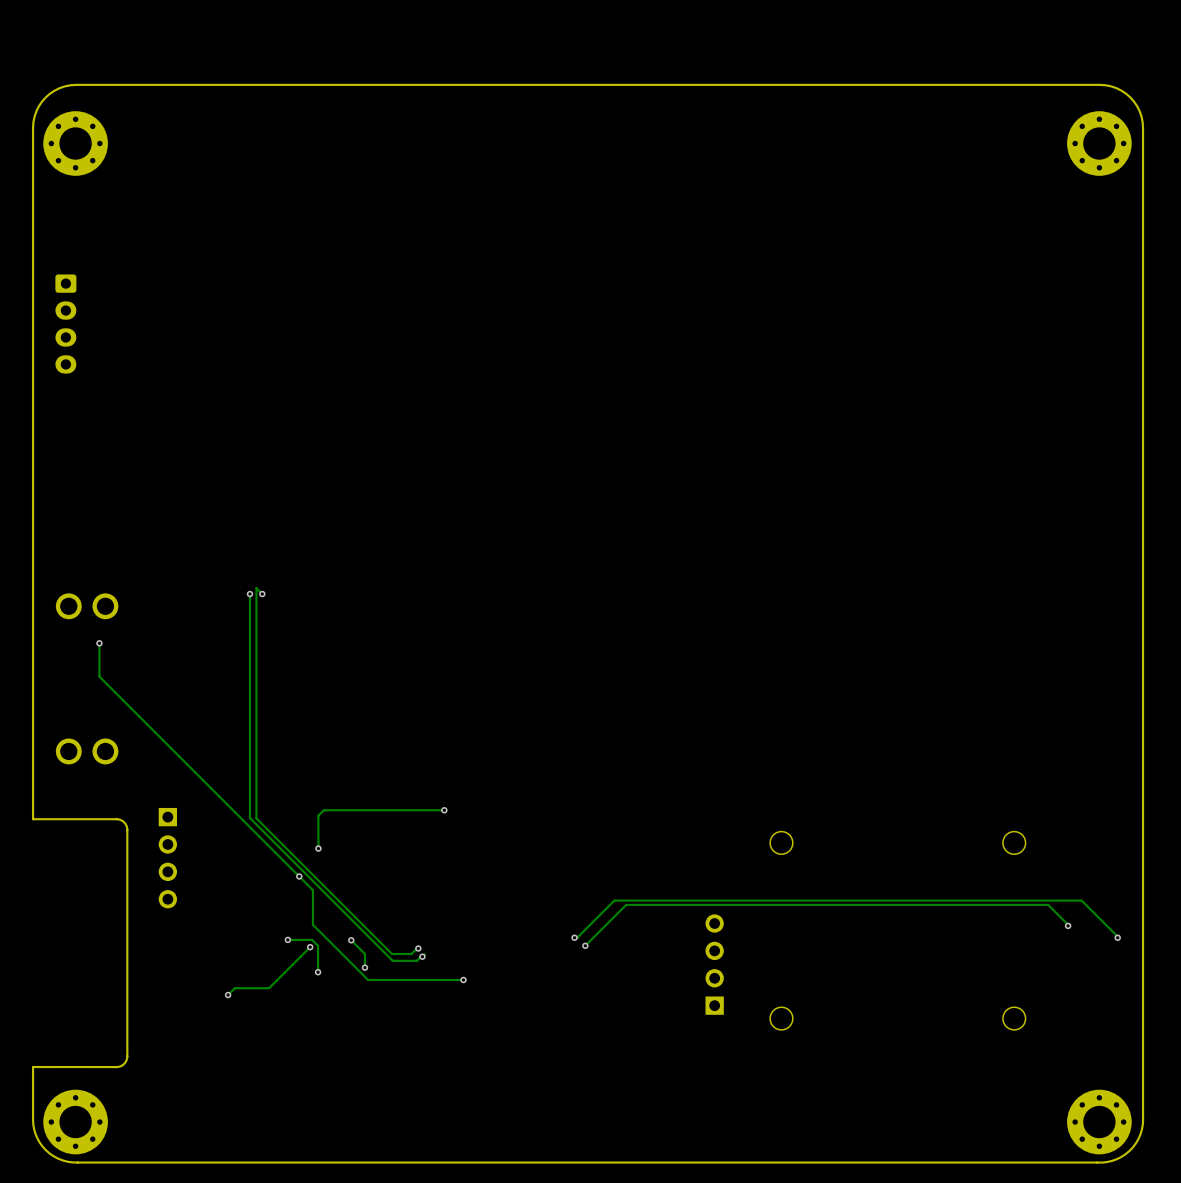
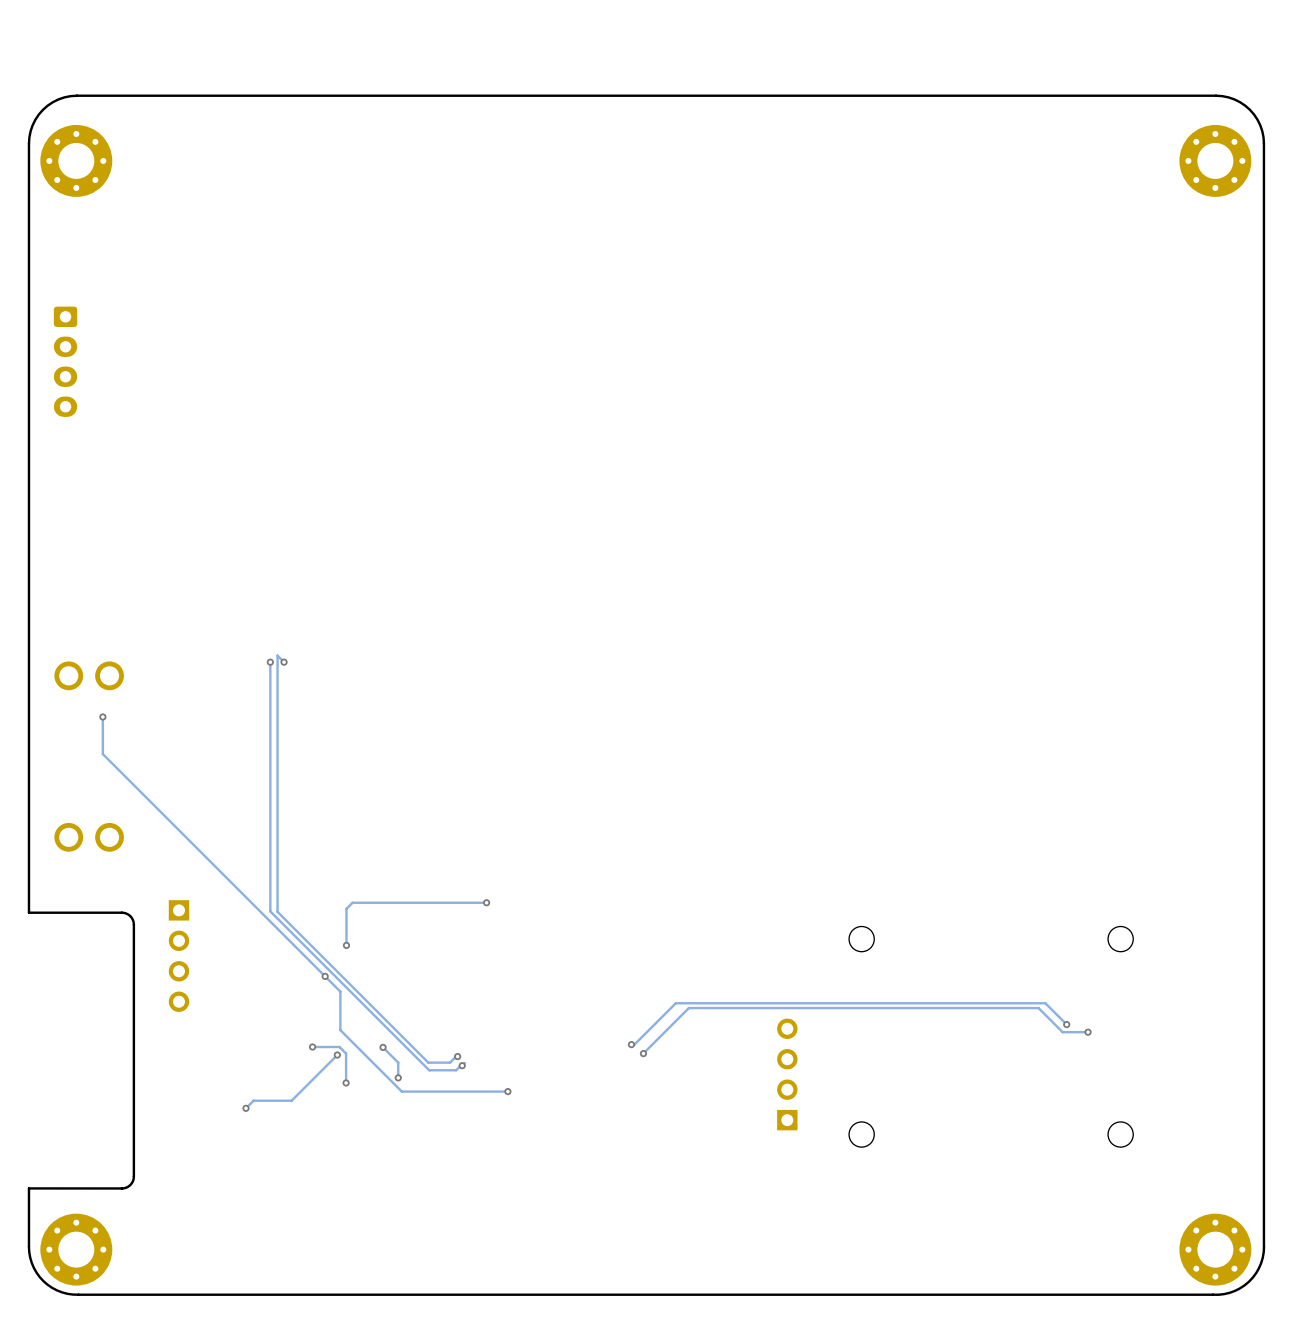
track: (946, 900) (1081, 900) (1117, 936) -> (1045, 1003) (1066, 1024)
track: (940, 904) (1048, 904) (1069, 925) (1068, 925) (1068, 924) -> (1038, 1008) (1062, 1032) (1088, 1032)
via: none -> (1066, 1024)
via: (1068, 925) -> none
via: none -> (1088, 1032)
via: (1117, 937) -> none

